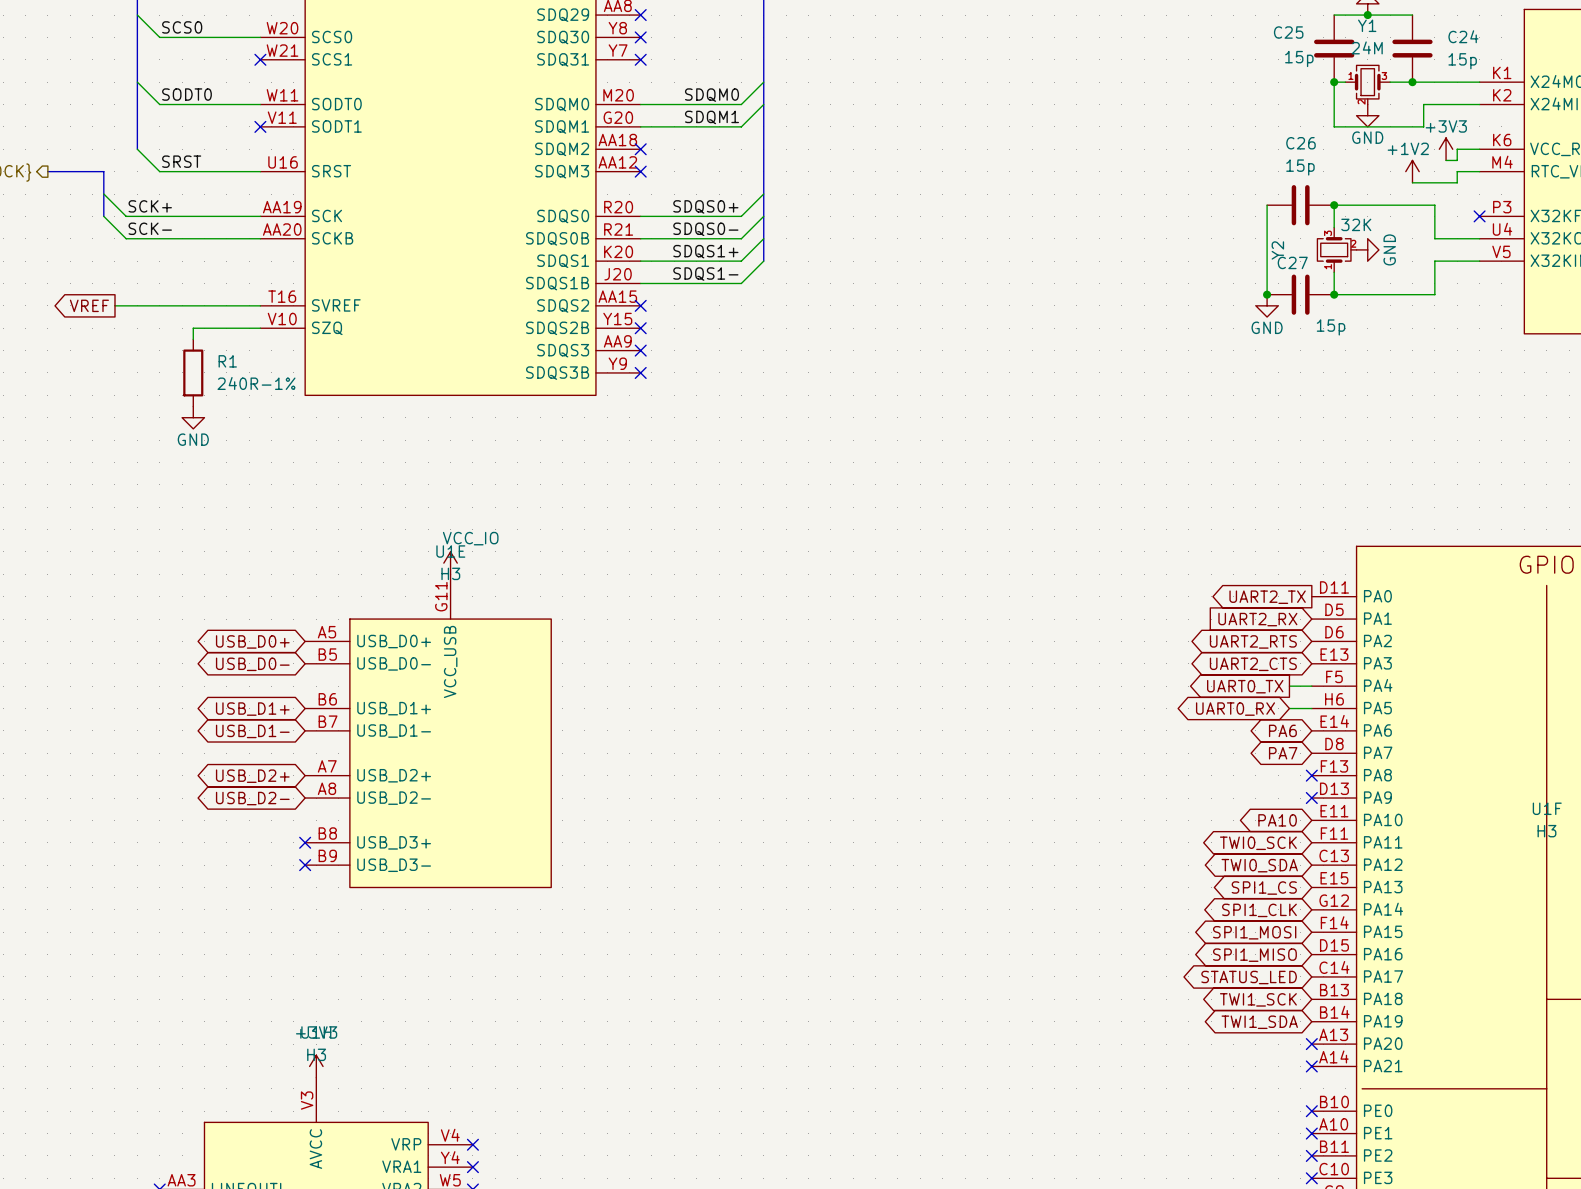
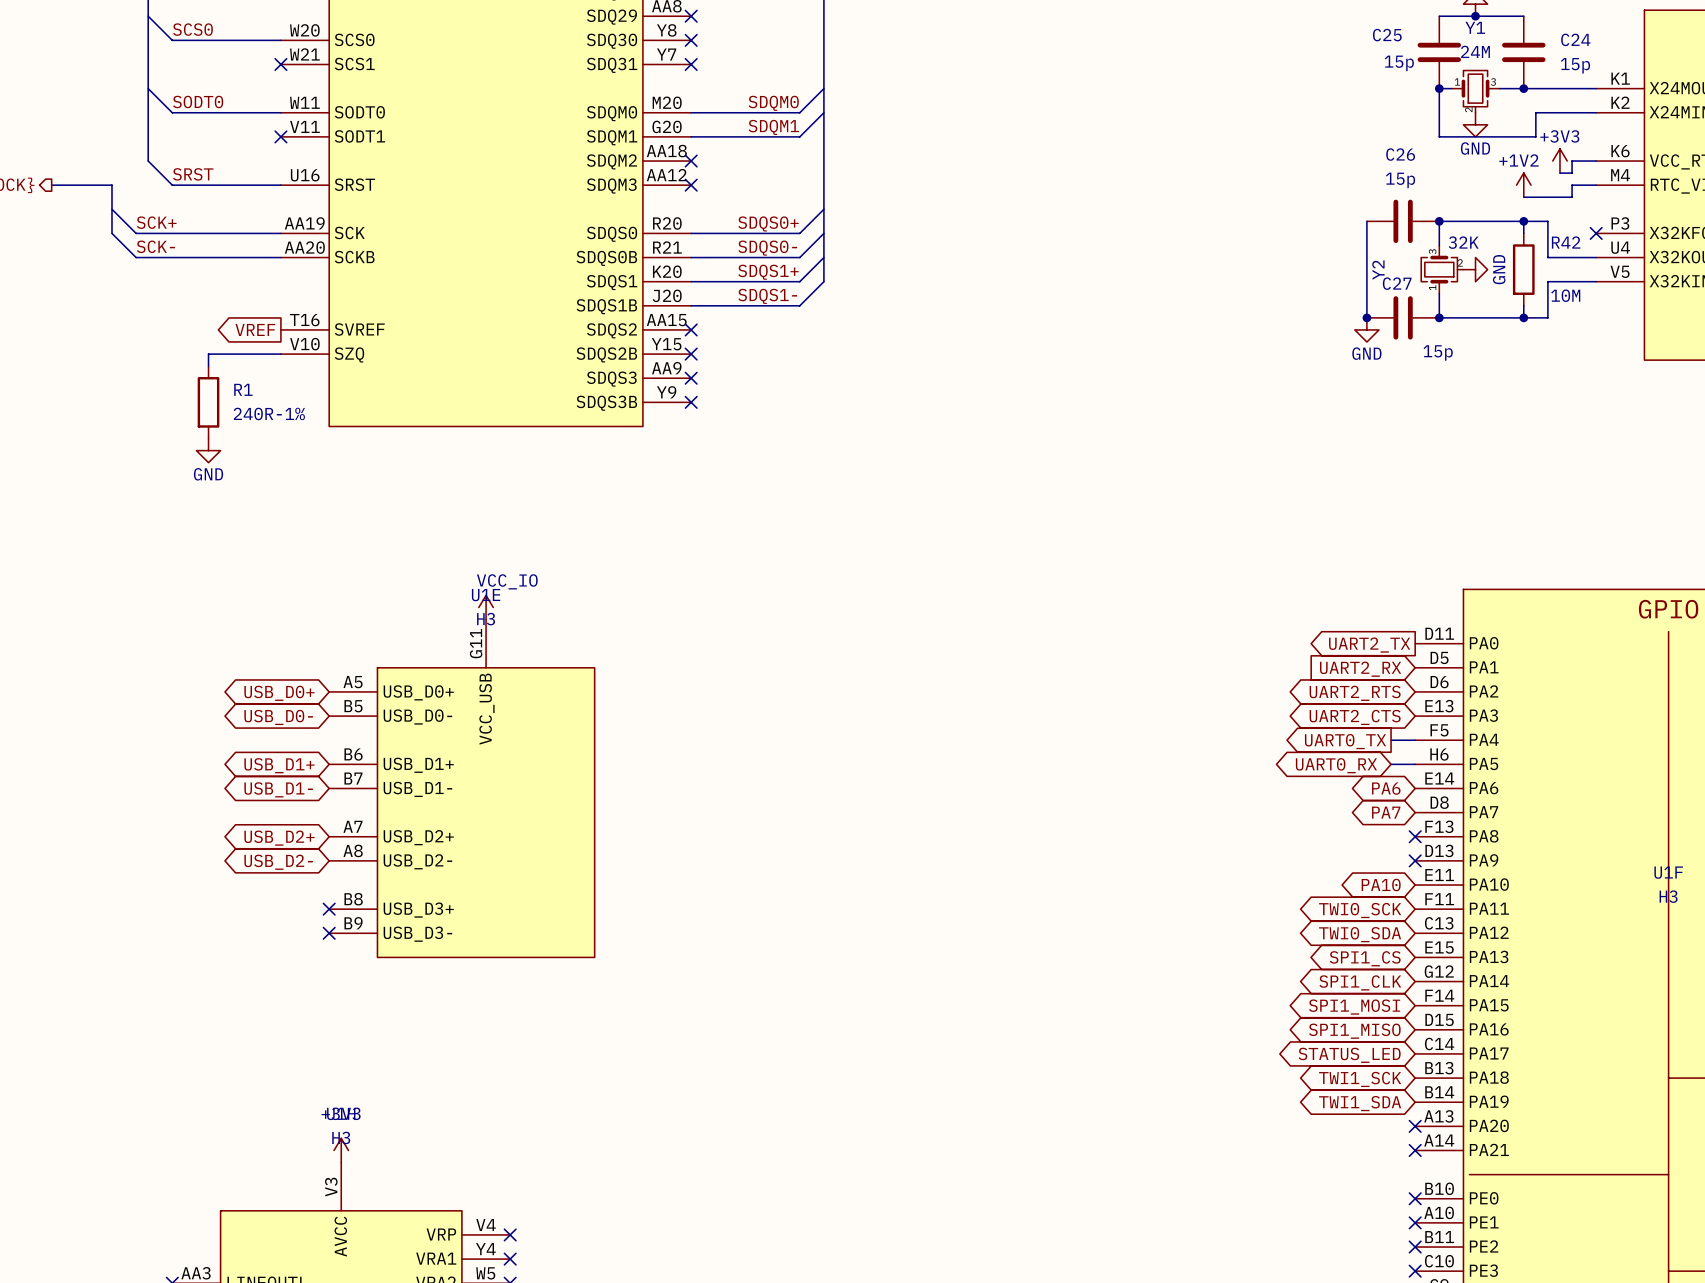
wire: none -> (1523, 221) (1523, 233)
junction: none -> (1523, 221)
R42: none -> 10M (1523, 269)
wire: none -> (1523, 305) (1523, 317)
junction: none -> (1523, 317)
global label position: VREF (89, 305) -> VREF (255, 329)
wire: (114, 305) (260, 305) -> none

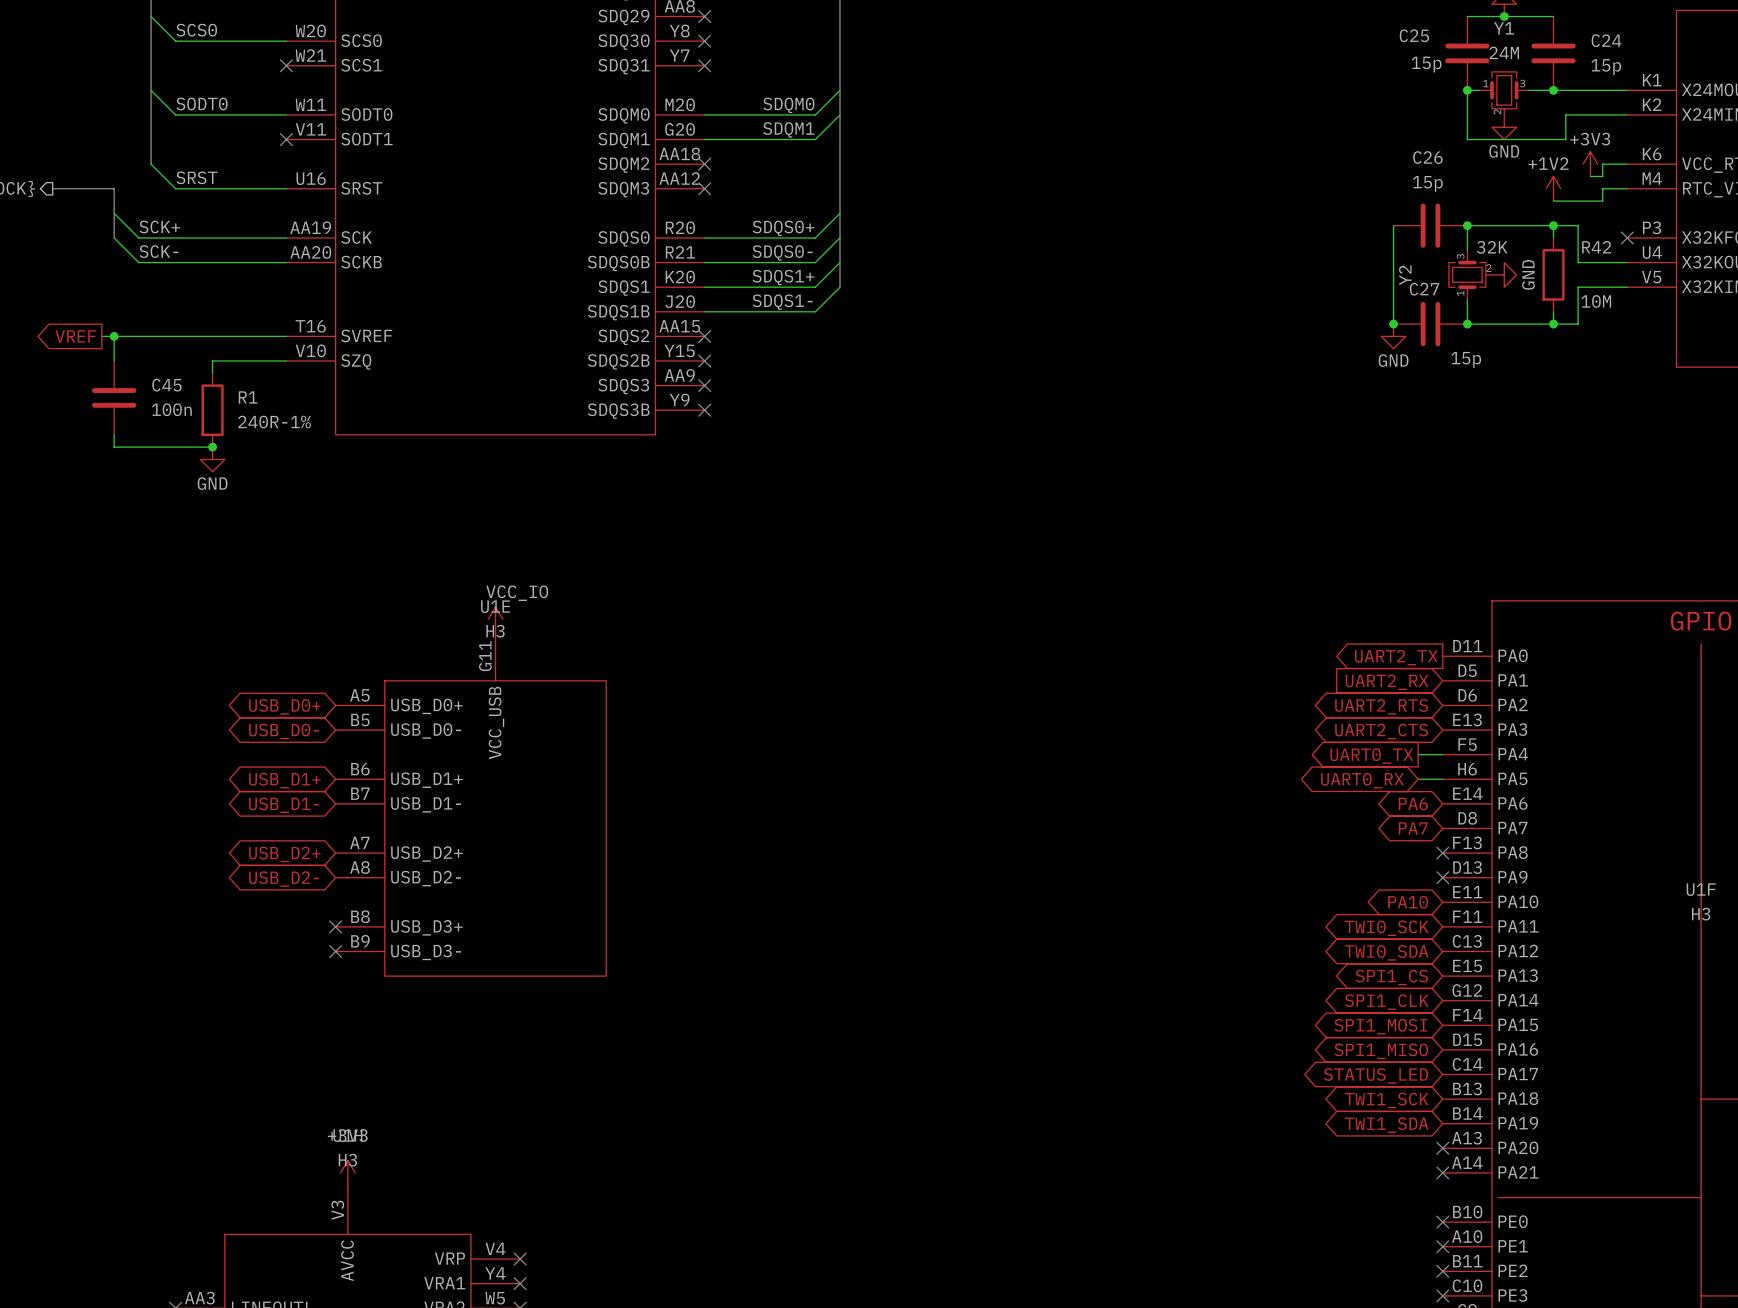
wire: none -> (101, 336) (286, 336)
wire: none -> (114, 336) (114, 361)
junction: none -> (114, 336)
global label position: VREF (255, 329) -> VREF (75, 336)
C45: none -> 100n (114, 397)
wire: none -> (114, 434) (114, 447) (212, 447)
junction: none -> (212, 447)

